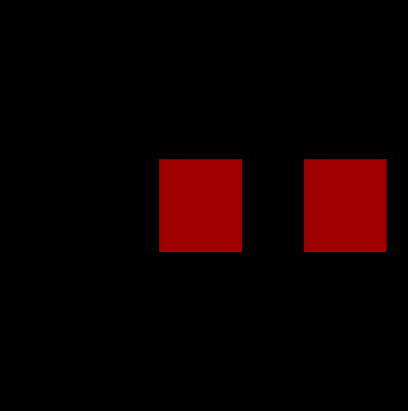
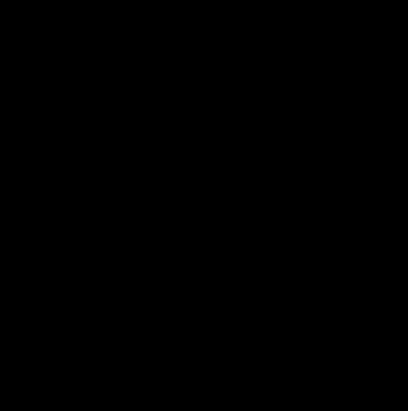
part: (272, 205) -> none

